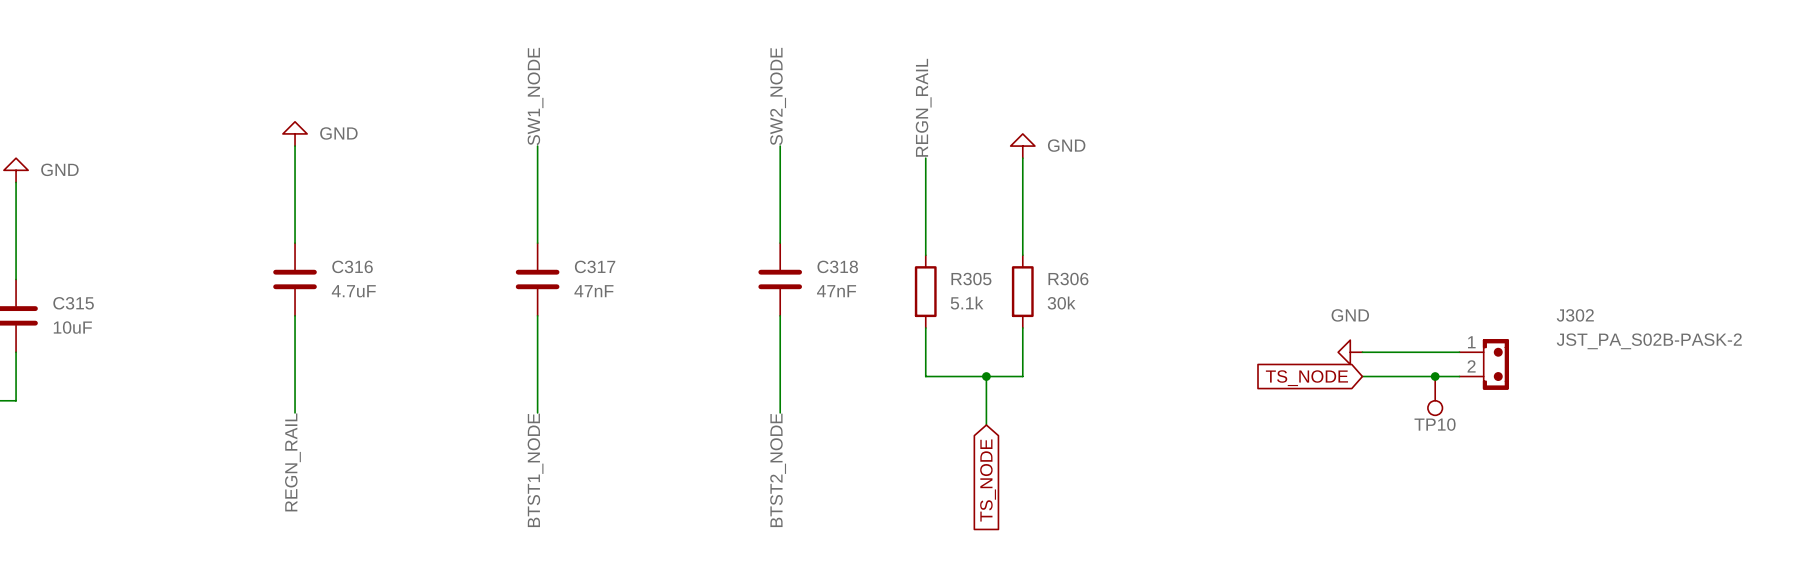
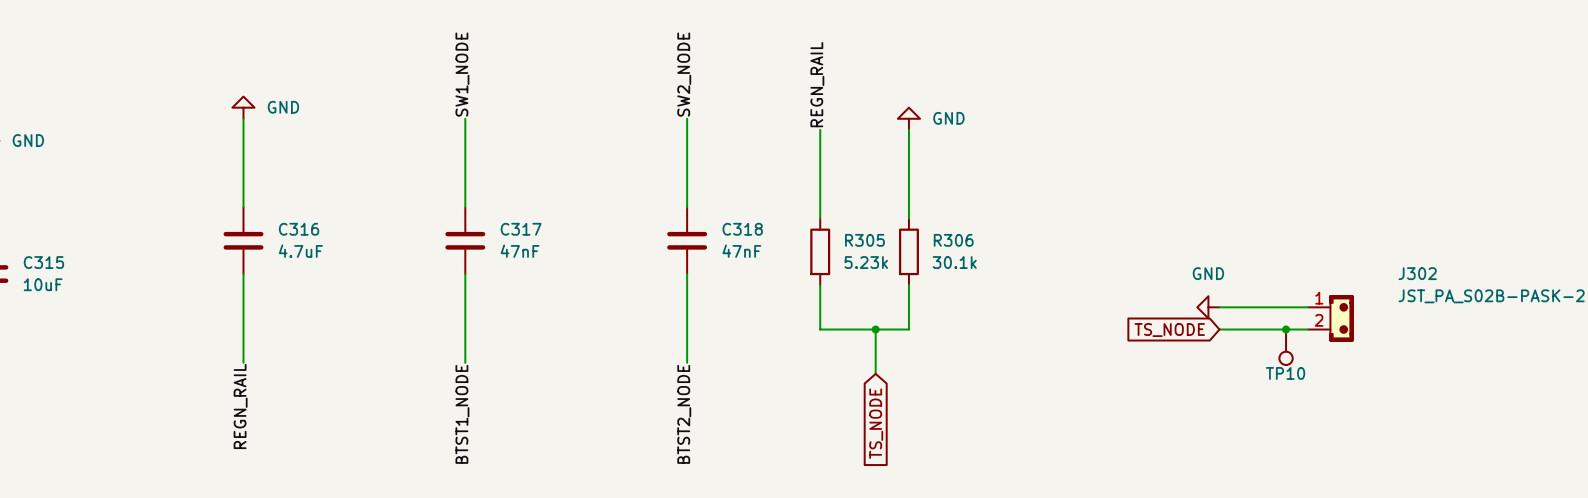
R305 value: 5.1k (967, 303) -> 5.23k (866, 262)
R306 value: 30k (1061, 303) -> 30.1k (954, 262)

